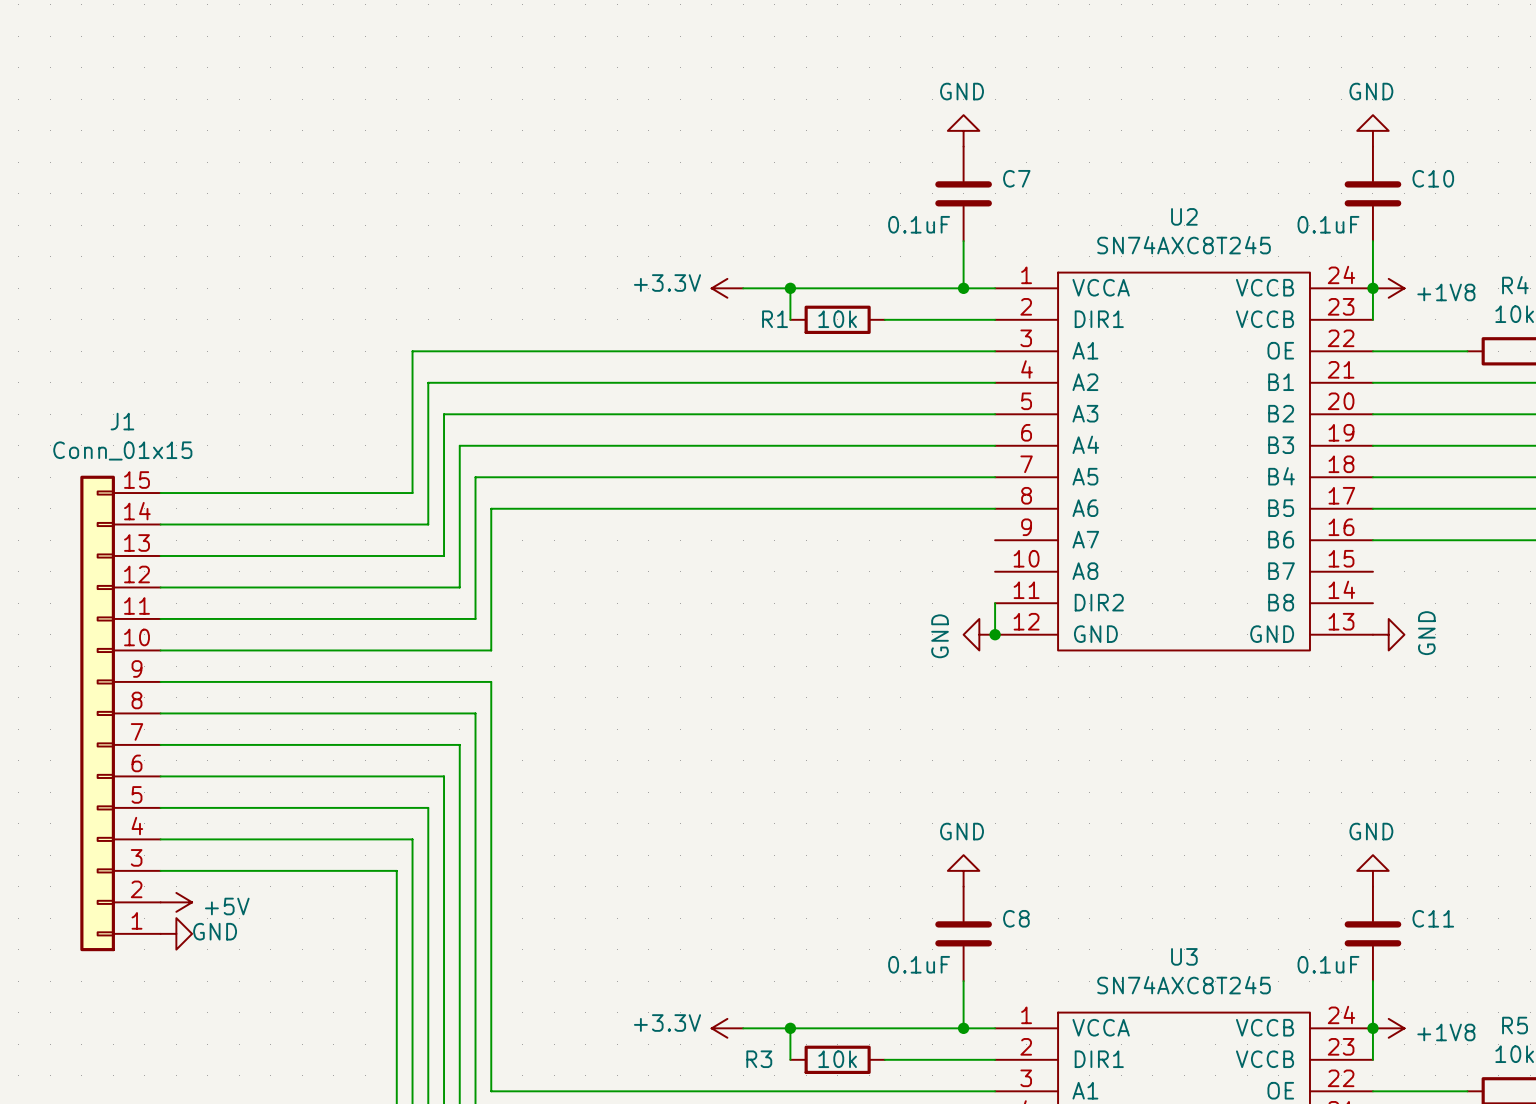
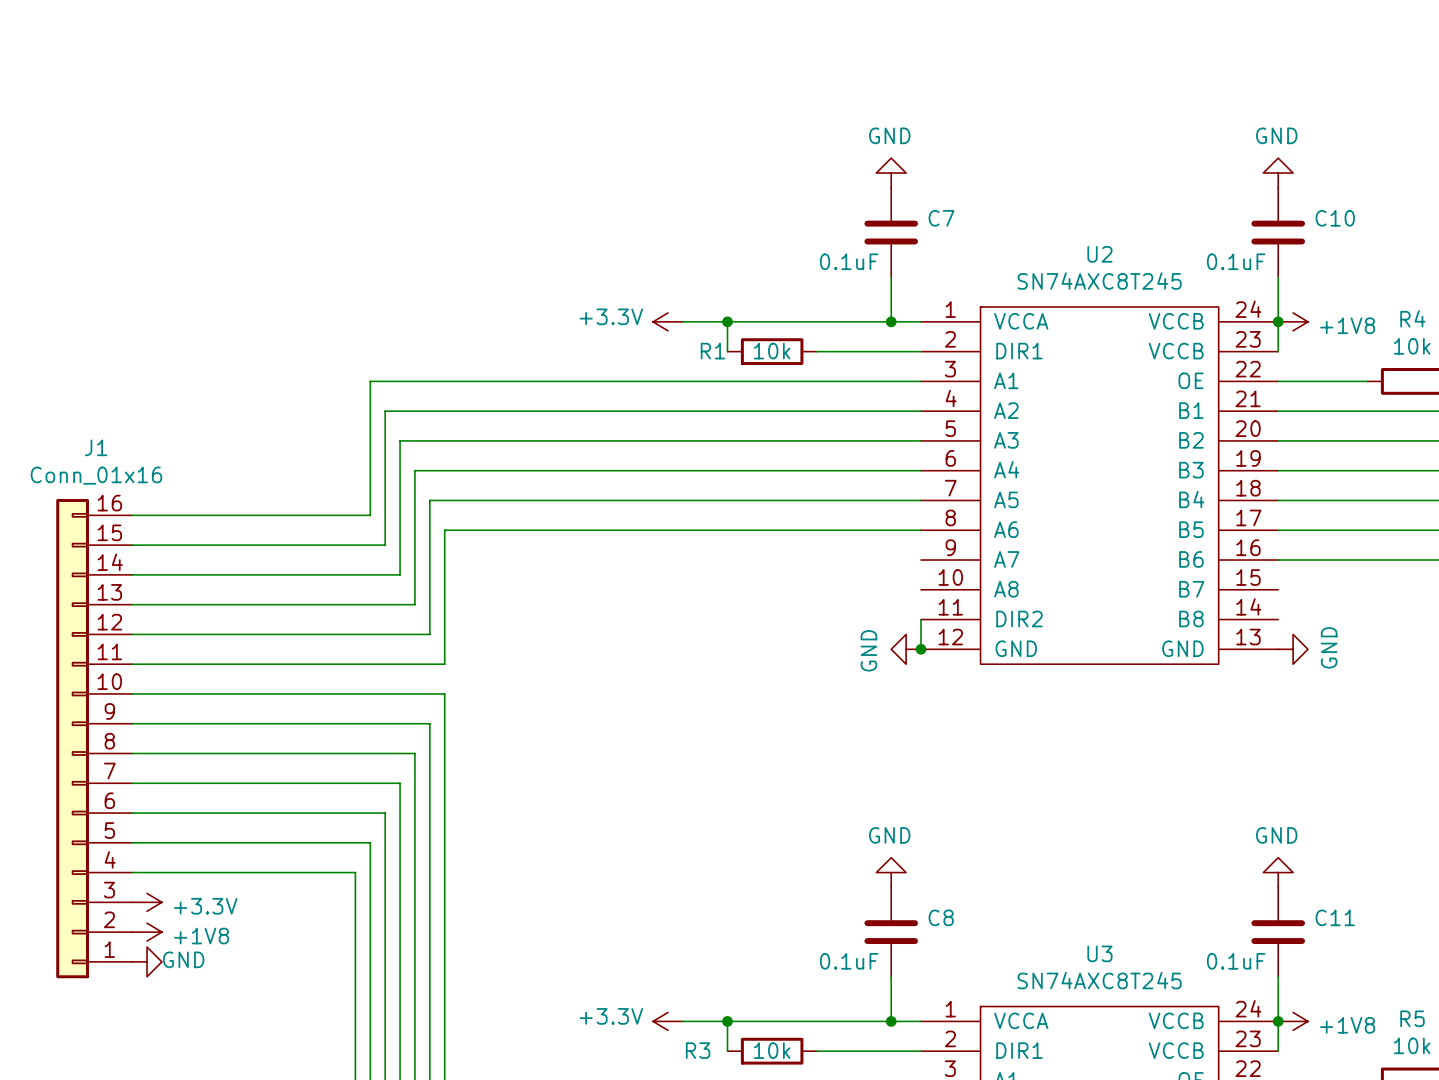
J1 value: Conn_01x15 (122, 450) -> Conn_01x16 (96, 475)
J1 symbol: [80, 475, 161, 952] -> [56, 498, 133, 979]
power symbol: +5V (176, 902) -> +3.3V (147, 902)
power symbol: GND (176, 933) -> +1V8 (147, 932)
power symbol: none -> GND (147, 961)

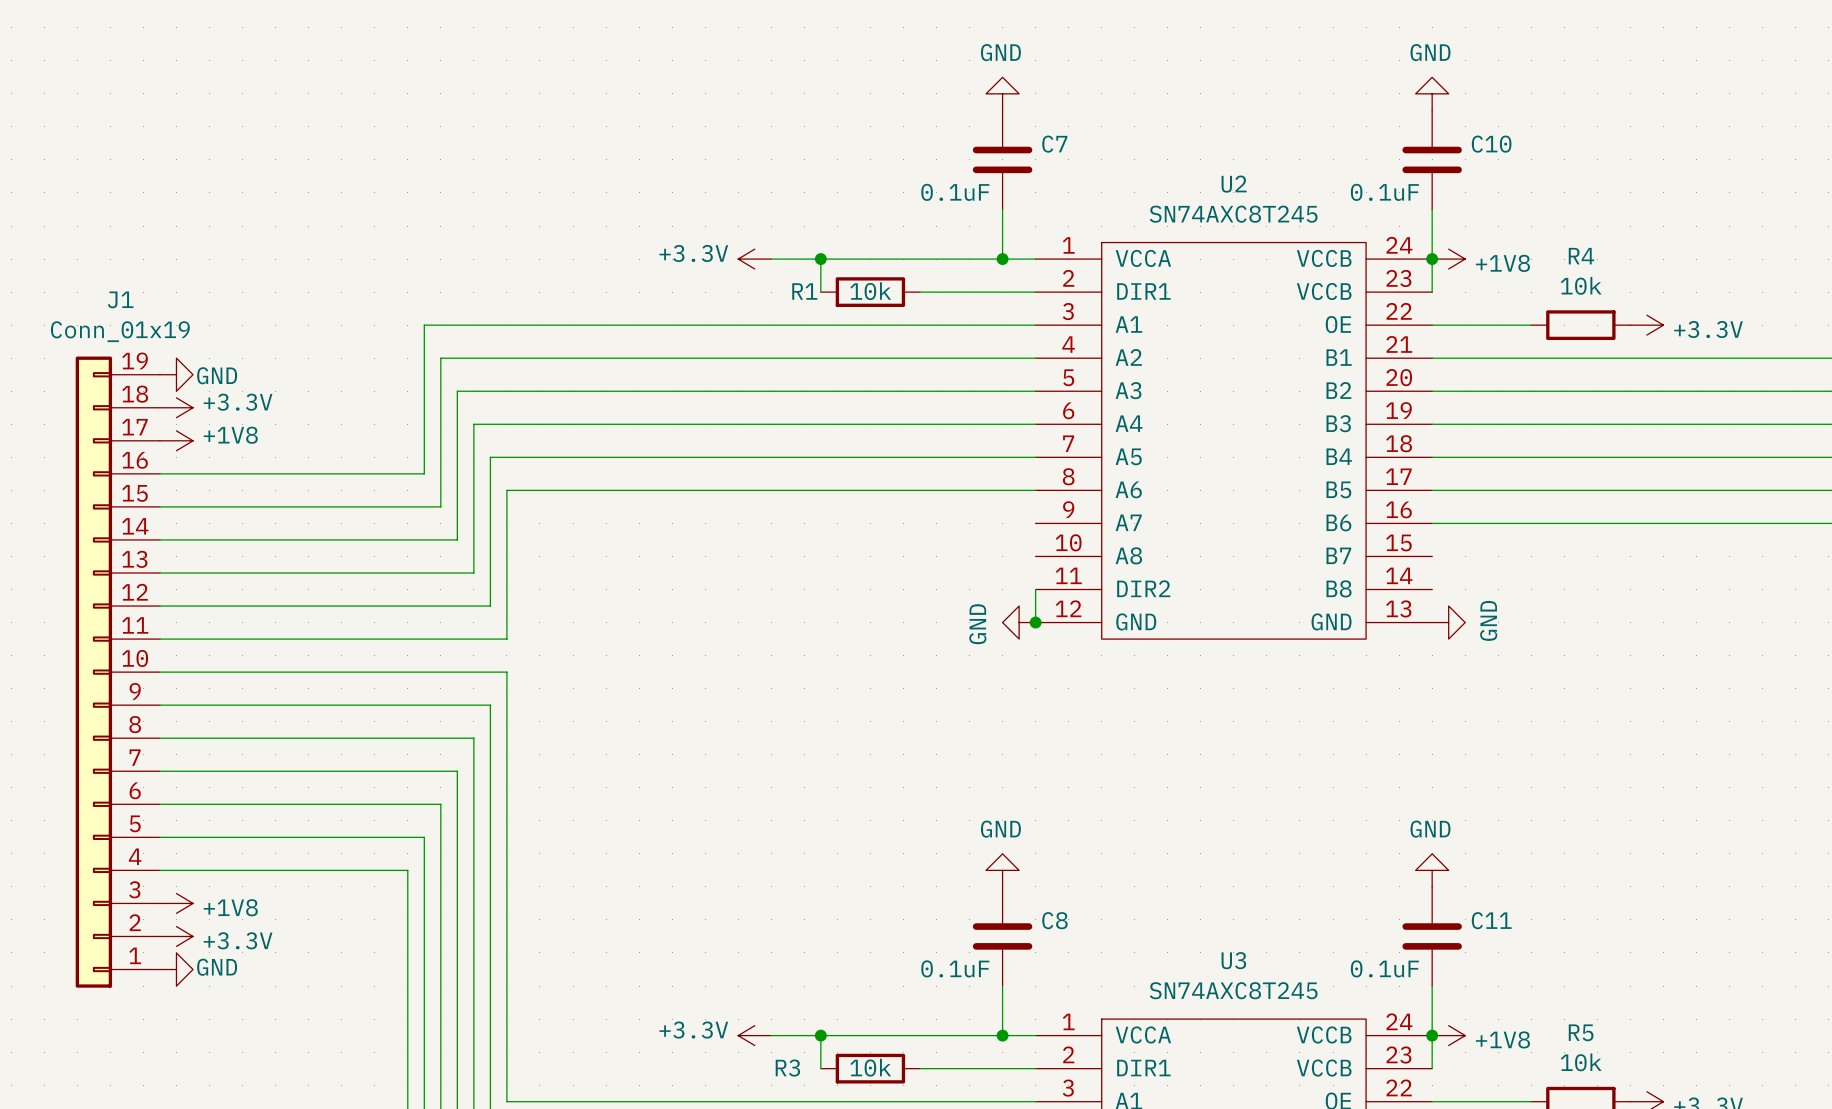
power symbol: none -> GND (176, 374)
J1 name position: J1 (96, 447) -> J1 (120, 299)
power symbol: none -> +3.3V (176, 407)
J1 value: Conn_01x16 (96, 475) -> Conn_01x19 (120, 331)
power symbol: none -> +1V8 (176, 440)
J1 symbol: [56, 498, 133, 979] -> [75, 356, 160, 988]
power symbol: +3.3V (147, 902) -> +1V8 (176, 903)
power symbol: +1V8 (147, 932) -> +3.3V (176, 936)

